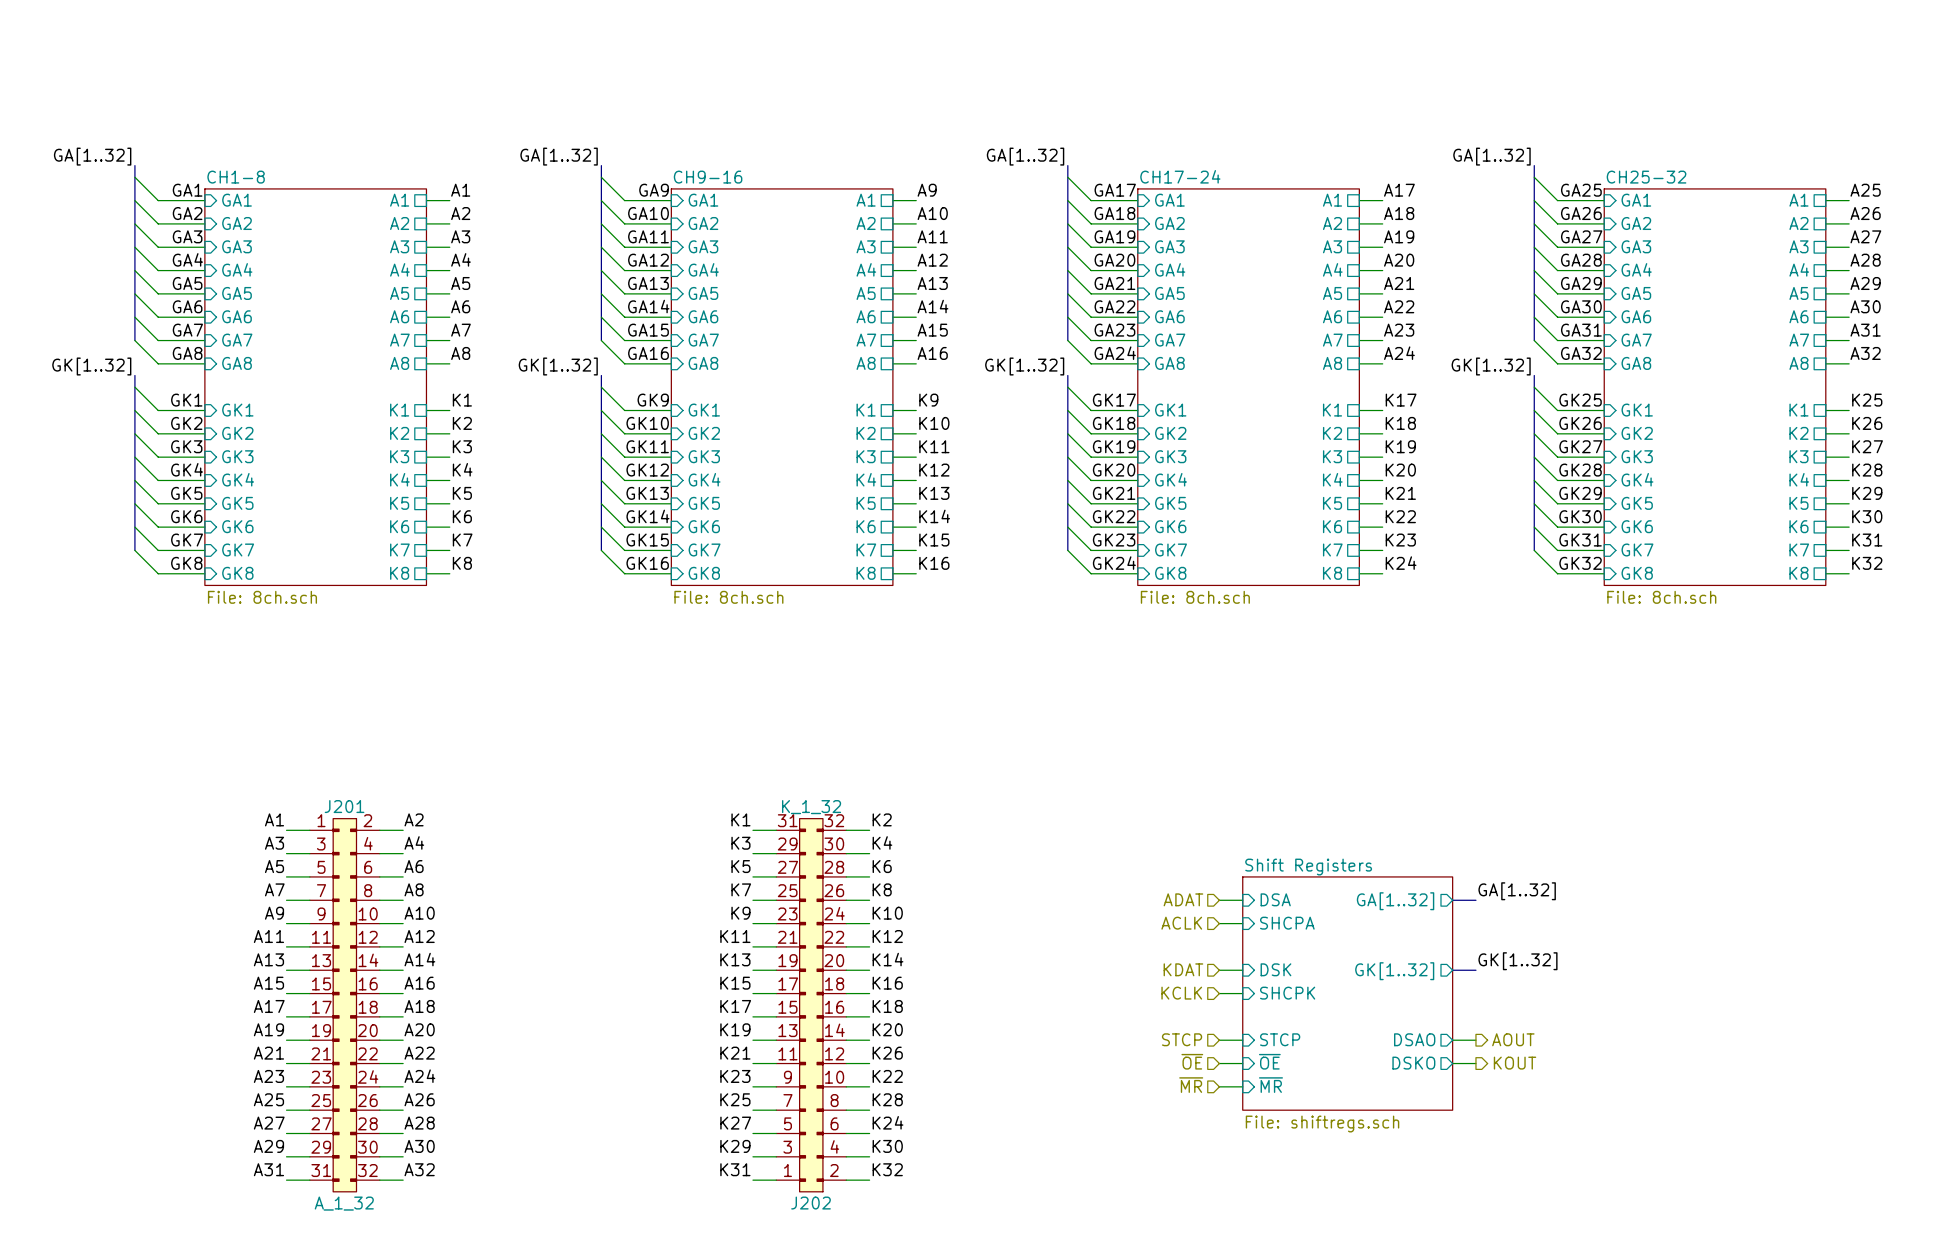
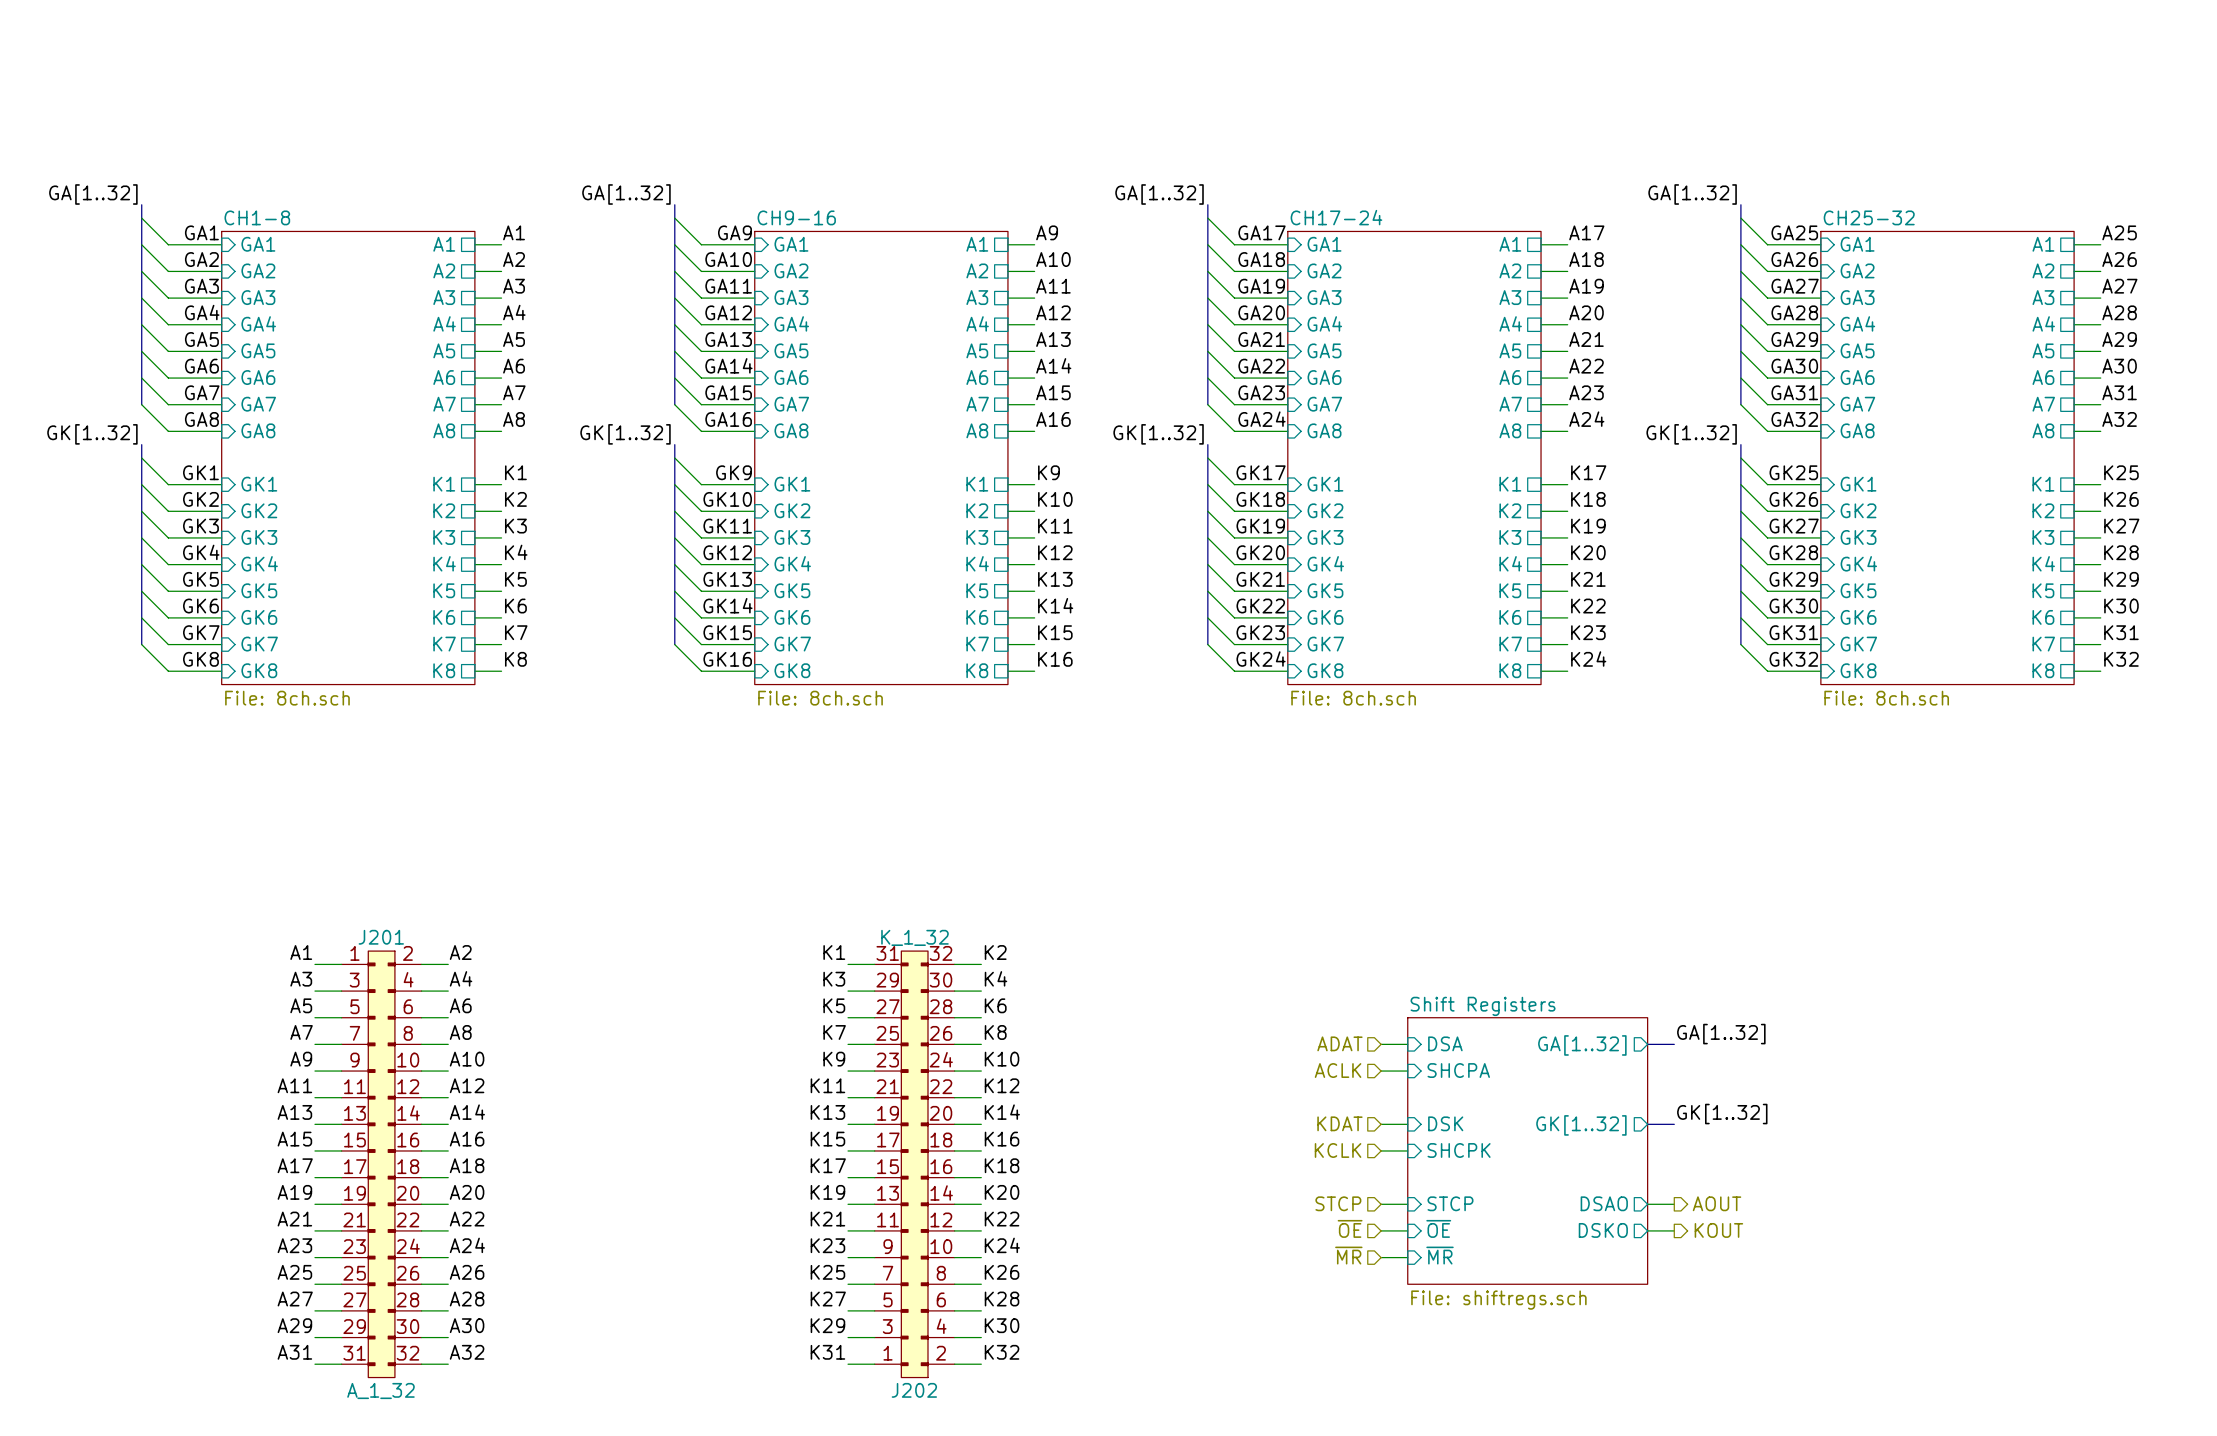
label: K26 (887, 1053) -> K22 (1002, 1219)
label: K22 (887, 1076) -> K24 (1002, 1245)
label: K28 (887, 1099) -> K26 (1002, 1272)
label: K24 (888, 1122) -> K28 (1002, 1299)

